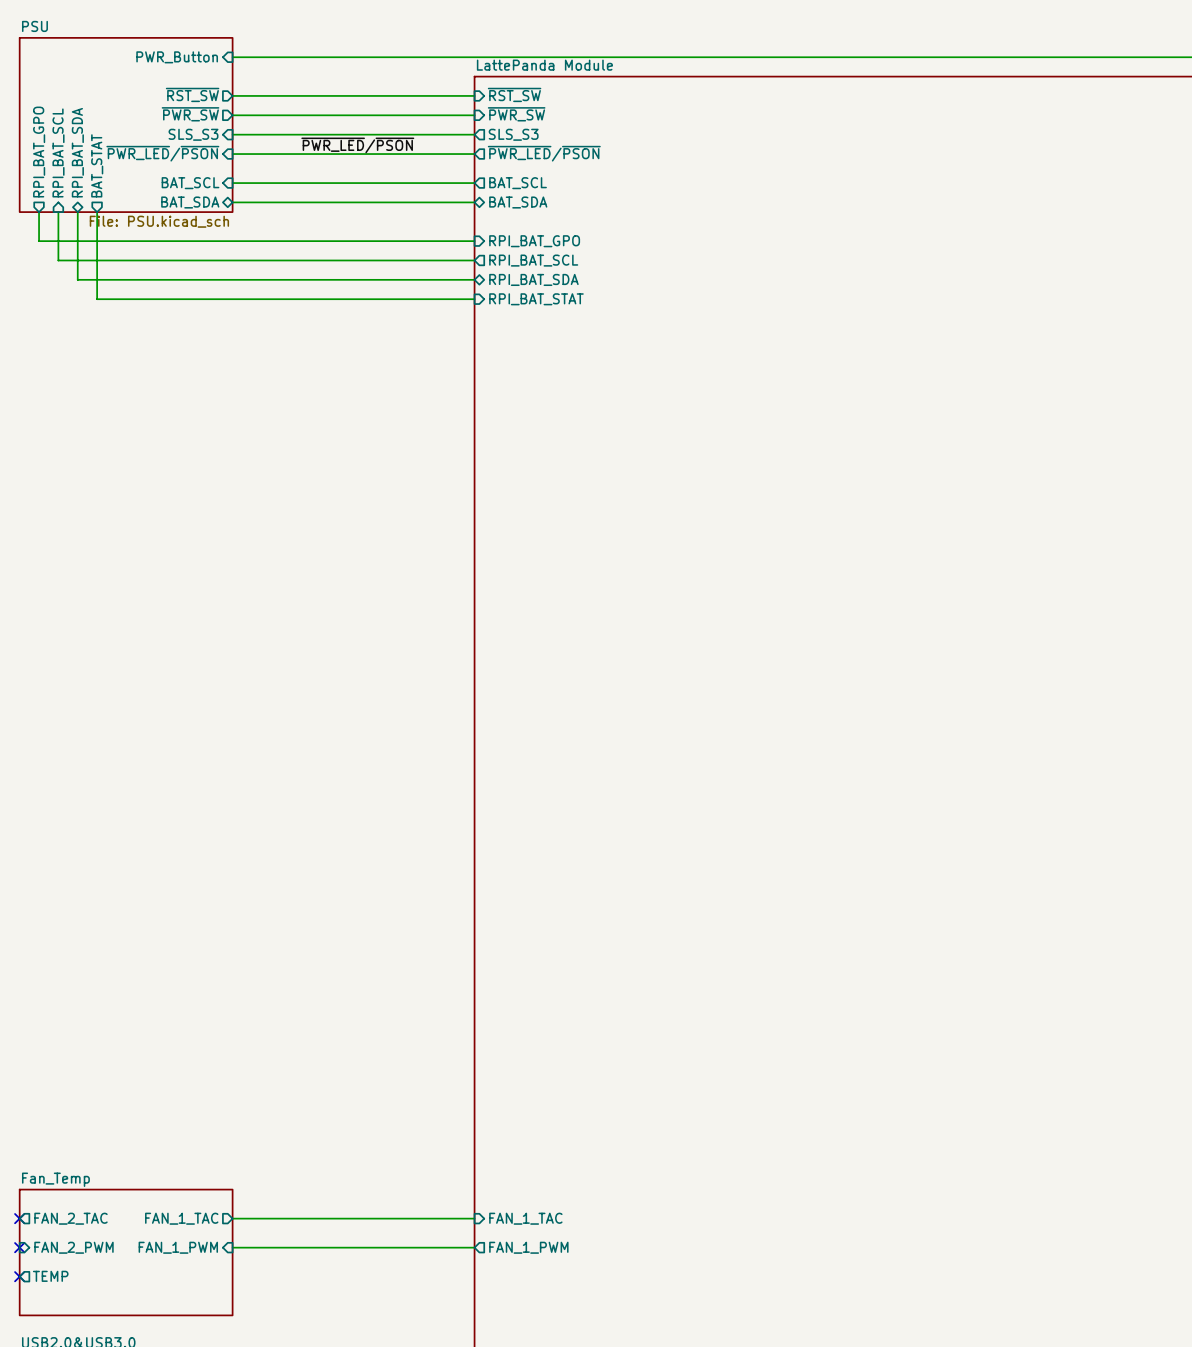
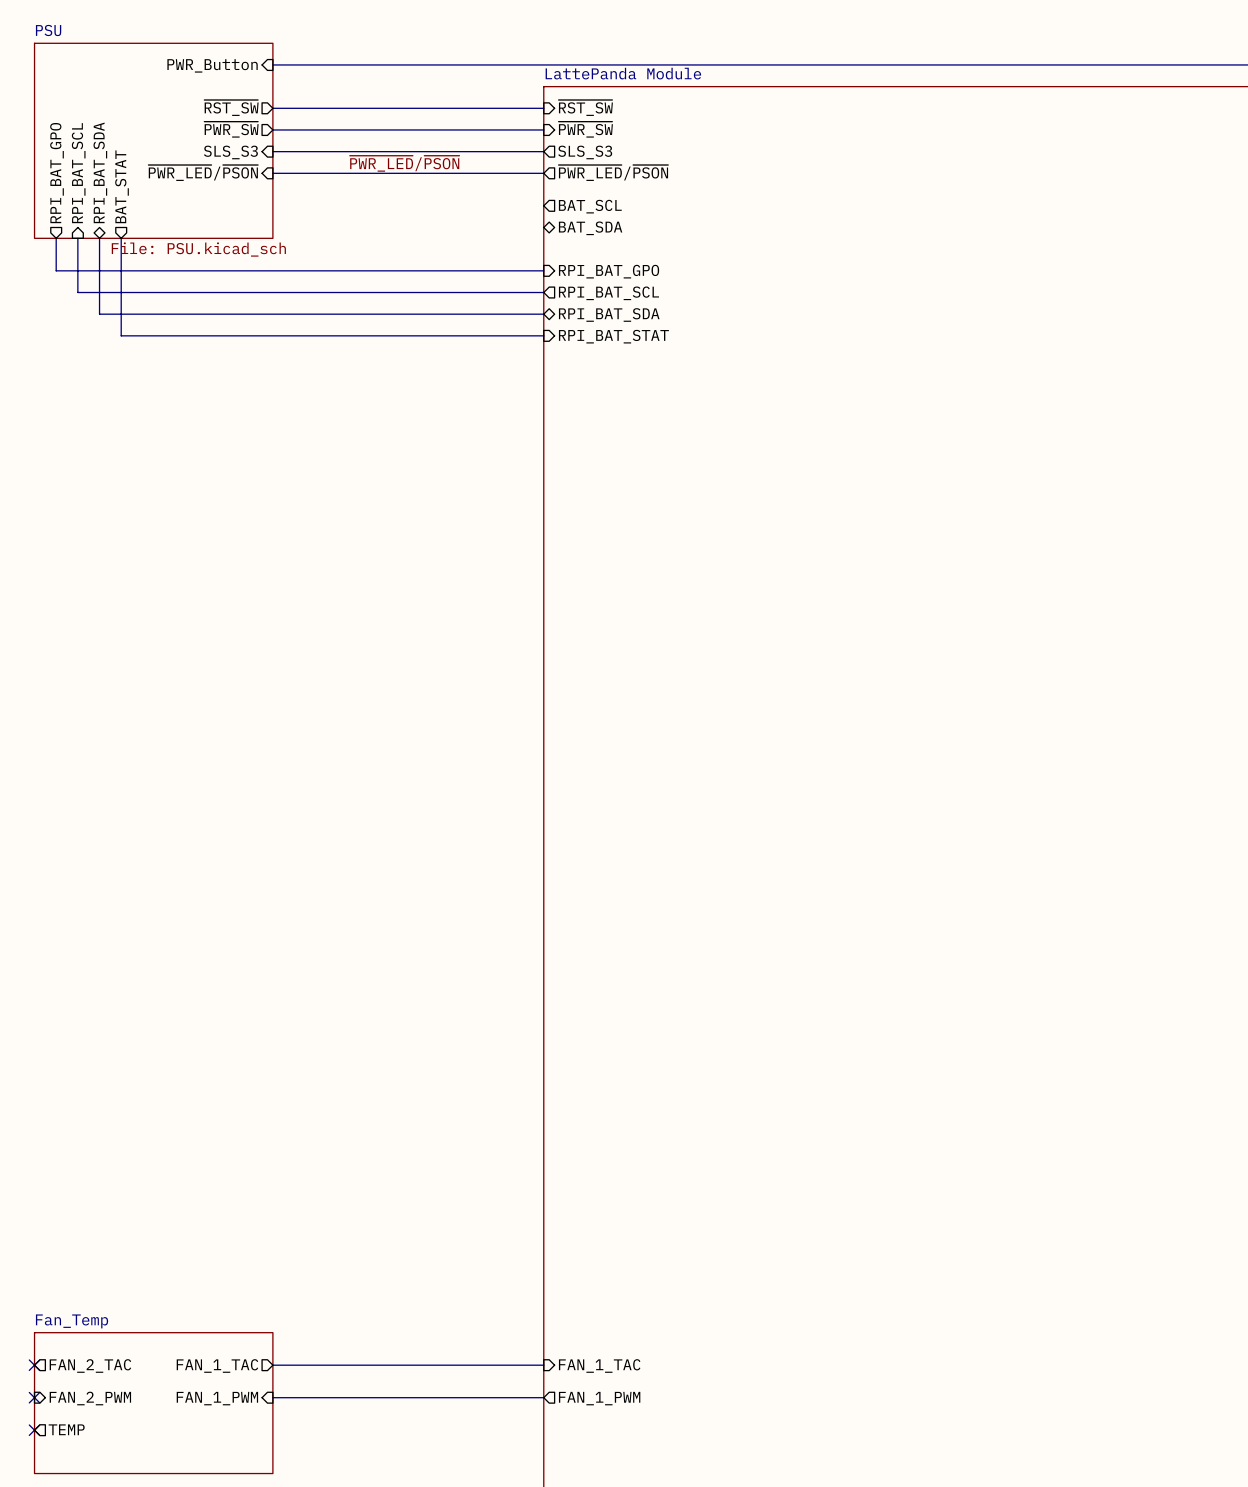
sheet pin: BAT_SCL (190, 183) -> none
wire: (232, 183) (474, 183) -> none
sheet pin: BAT_SDA (190, 202) -> none
wire: (232, 202) (474, 202) -> none

